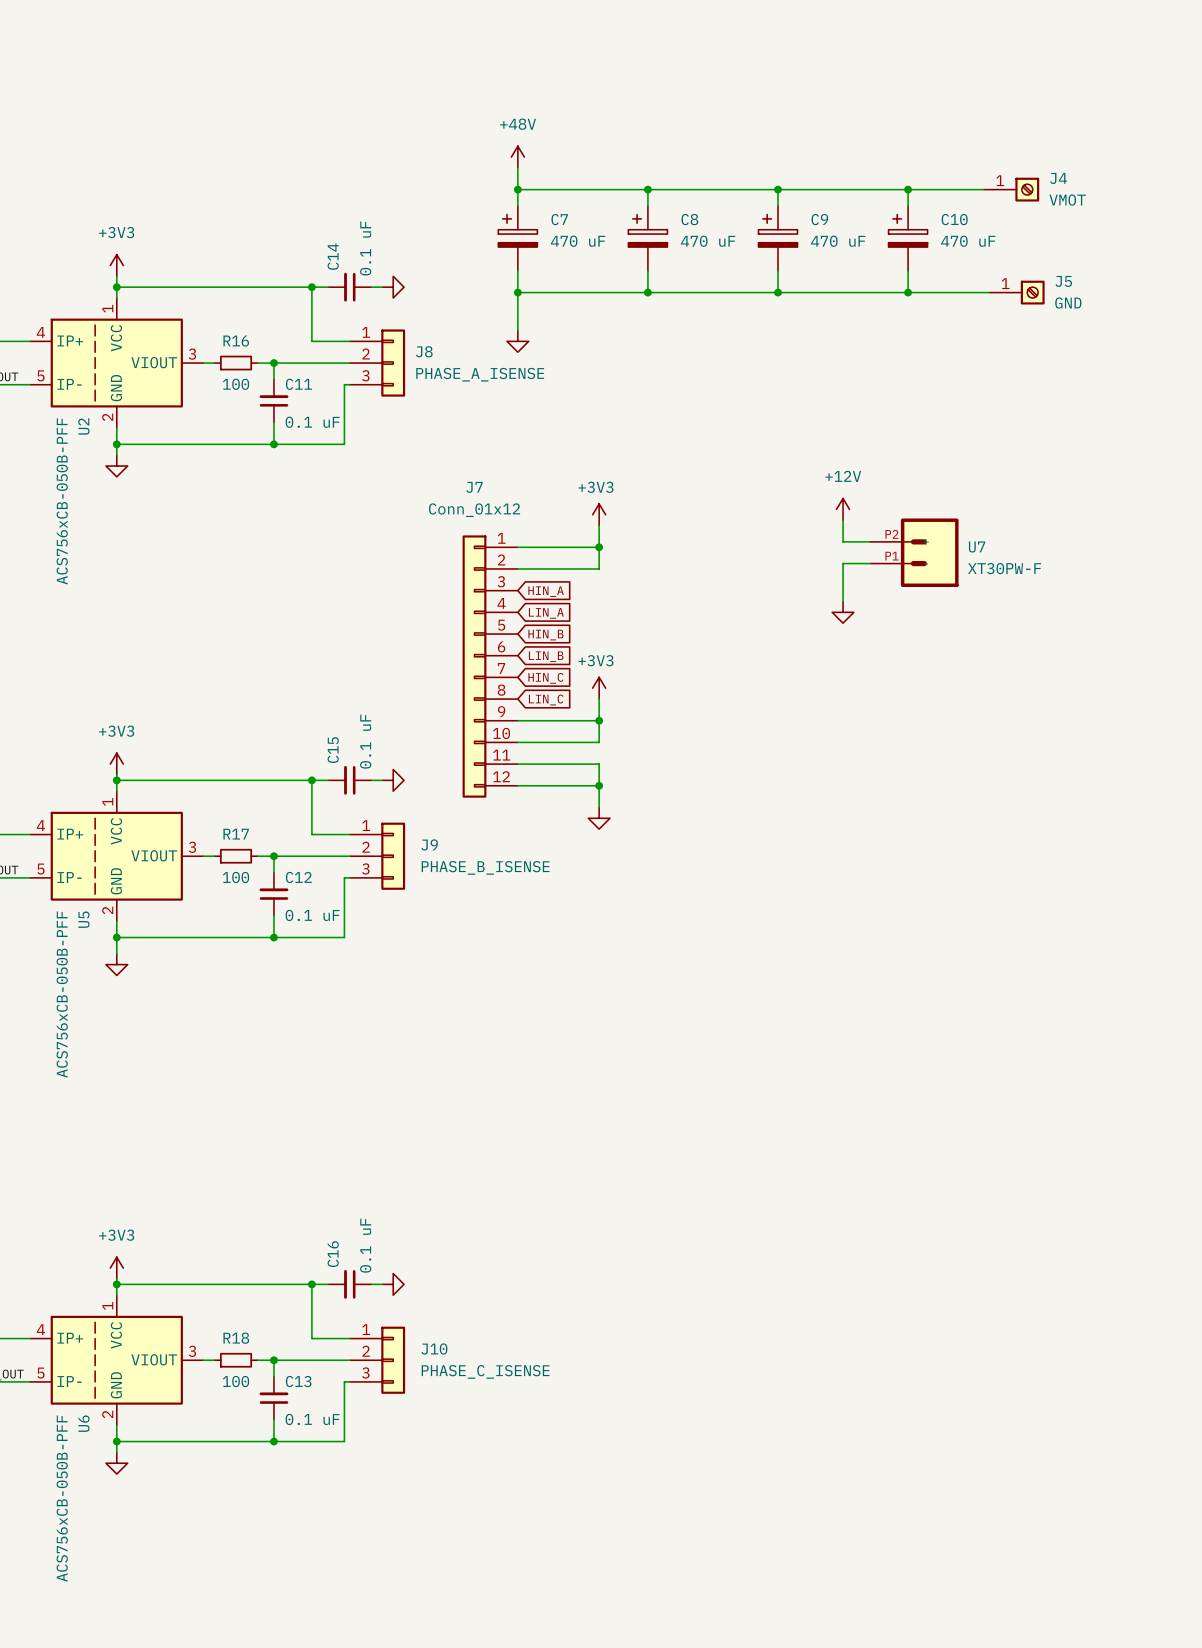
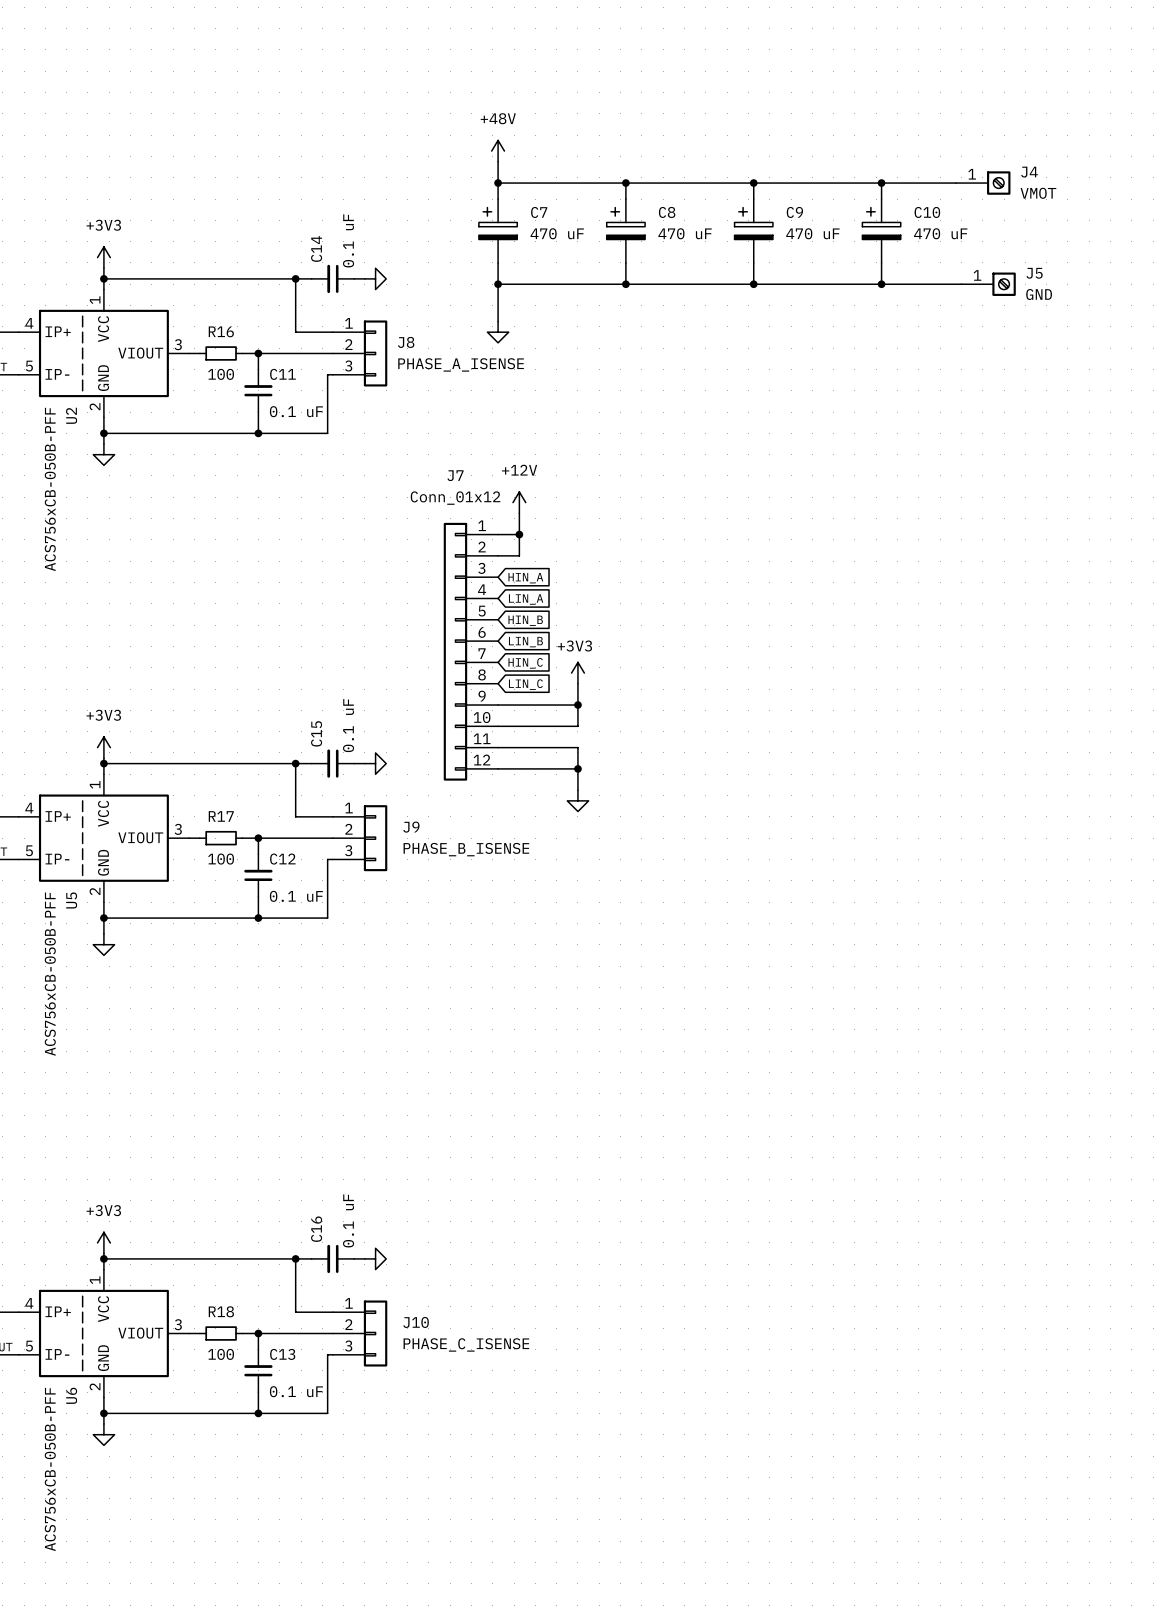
power symbol: +12V (843, 509) -> none
power symbol: none -> +12V (519, 502)
power symbol: +3V3 (599, 514) -> none
wire: (843, 520) (843, 541) (870, 541) -> none
wire: (599, 525) (599, 568) (539, 568) -> (519, 513) (519, 555)
wire: (539, 547) (599, 547) -> none
junction: none -> (519, 534)
junction: (599, 547) -> none
U7: XT30PW-F (914, 552) -> none
wire: (870, 563) (843, 563) (843, 601) -> none
power symbol: (843, 612) -> none

